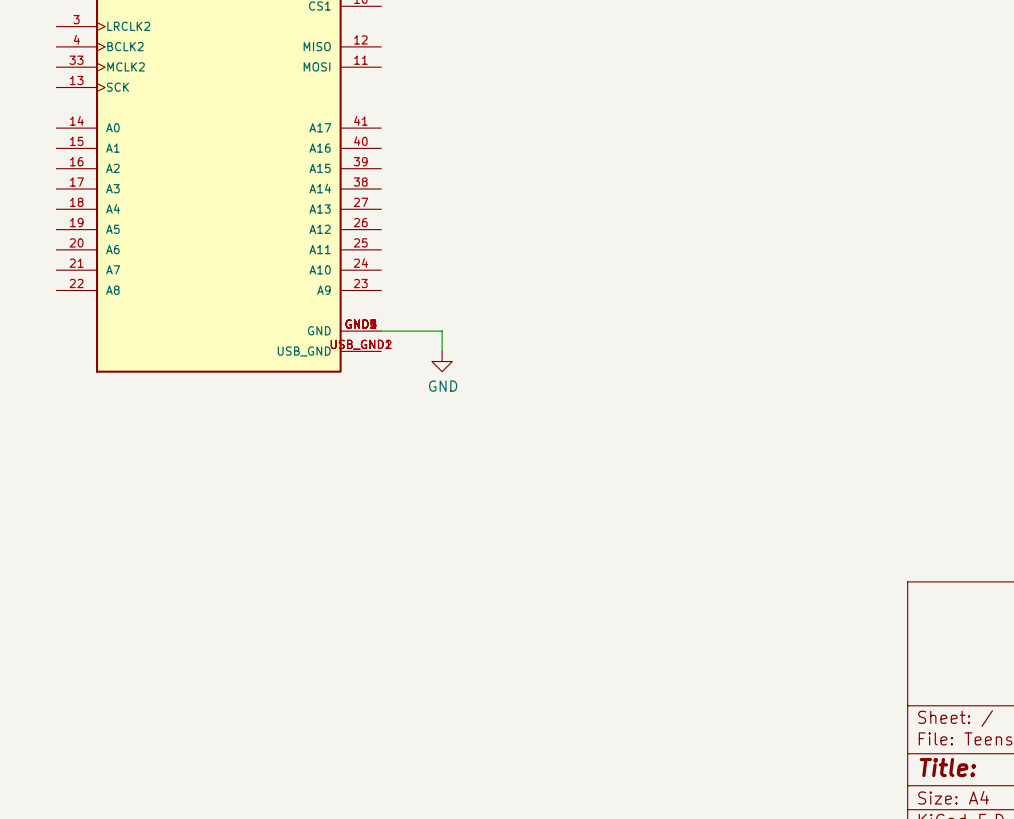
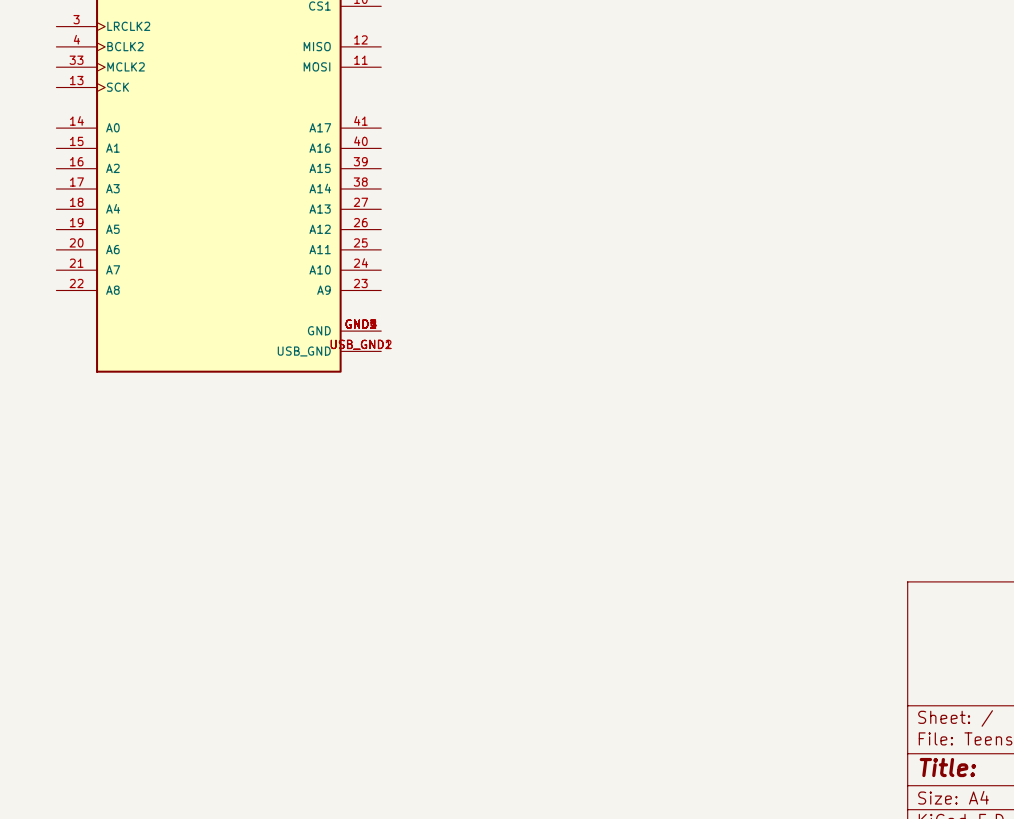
wire: (381, 331) (442, 331) (442, 351) -> none
power symbol: GND (442, 361) -> none

